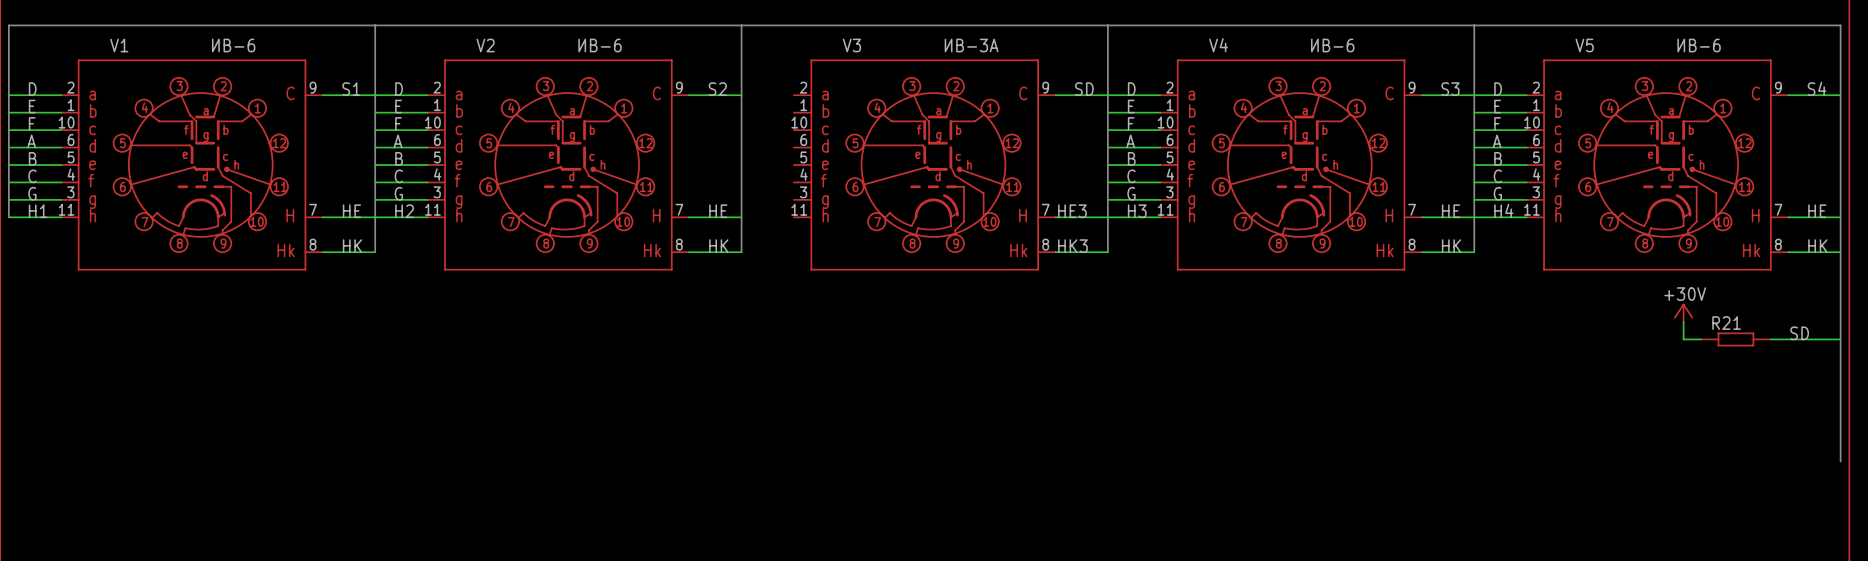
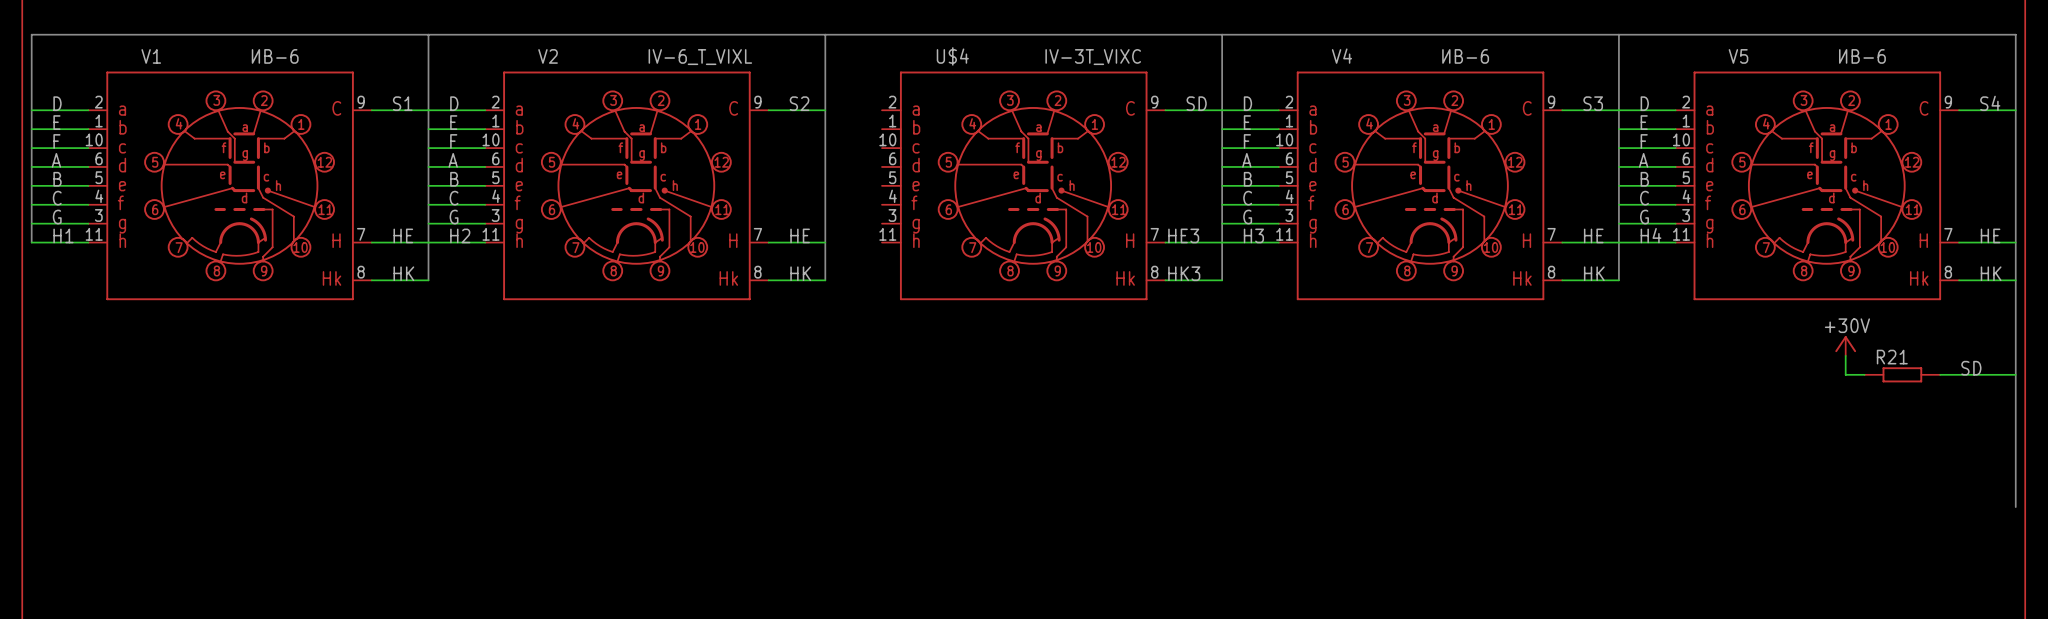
V2 value: ИВ-6 (600, 45) -> IV-6_T_VIXL (700, 57)
V3 name: V3 (851, 45) -> U$4 (952, 56)
V3 value: ИВ-3А (971, 45) -> IV-3T_VIXC (1093, 57)

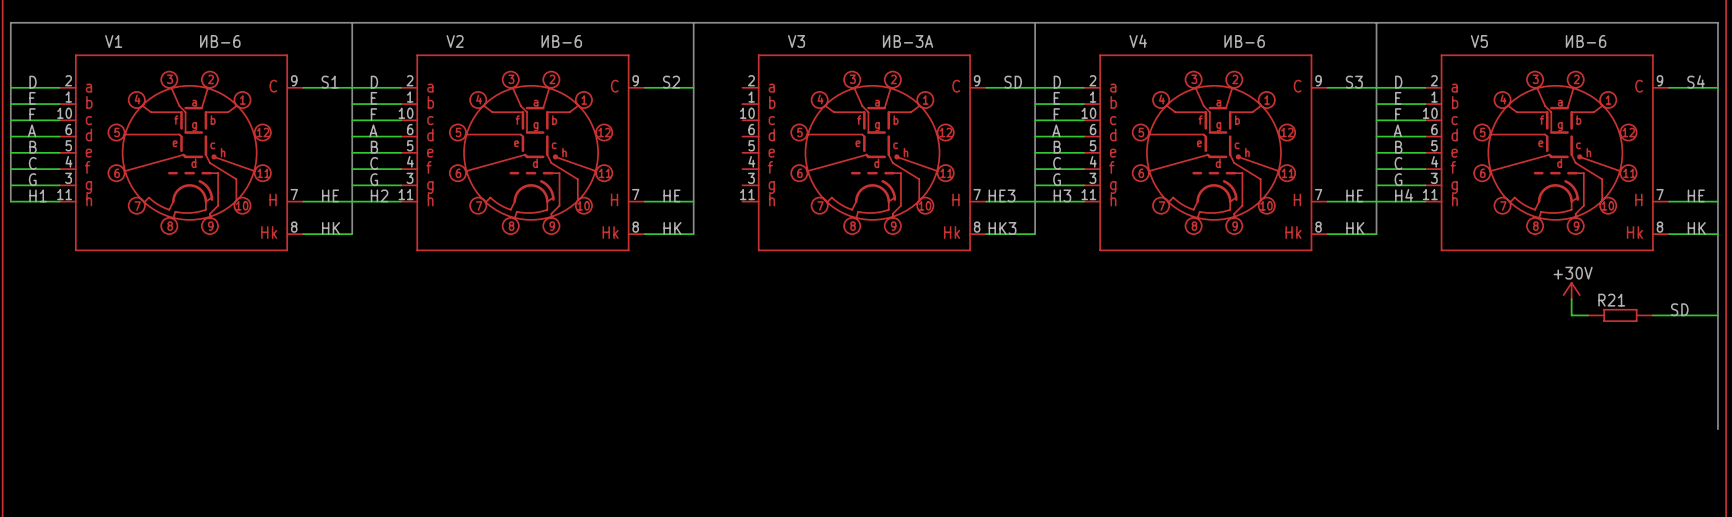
U$4 name: U$4 (952, 56) -> V3 (796, 41)
V2 value: IV-6_T_VIXL (700, 57) -> ИВ-6 (561, 41)
U$4 value: IV-3T_VIXC (1093, 57) -> ИВ-3А (908, 41)

